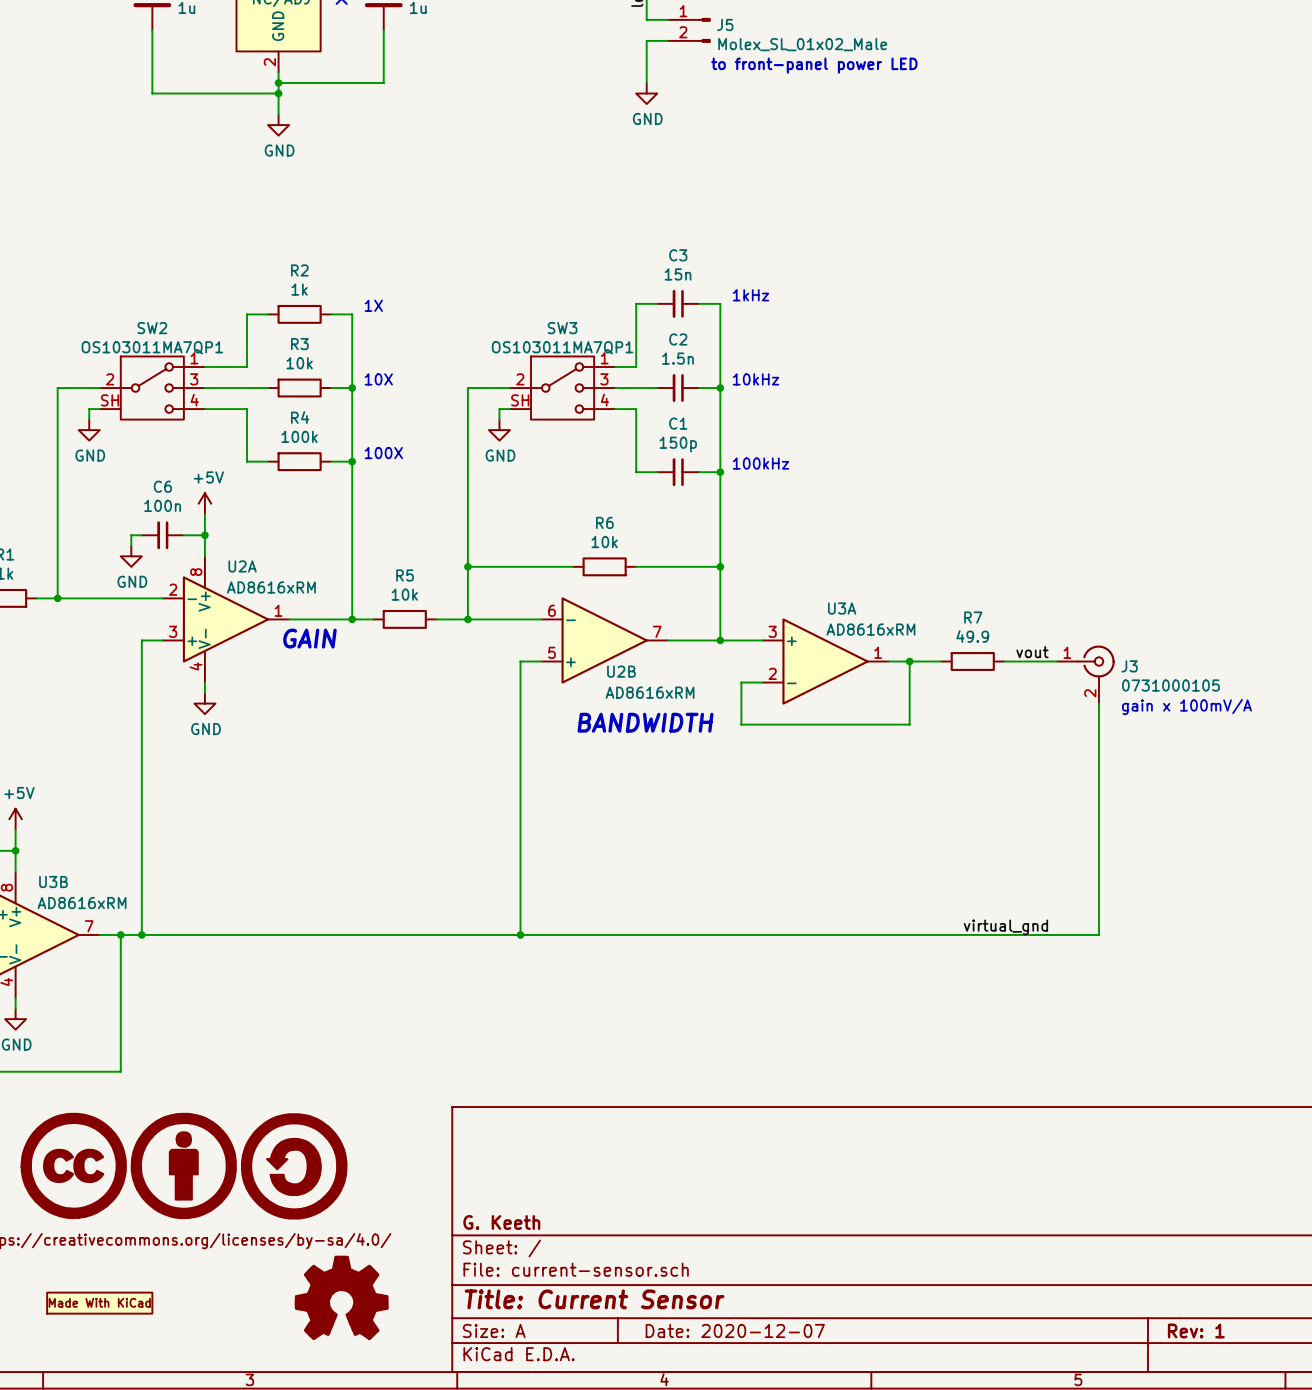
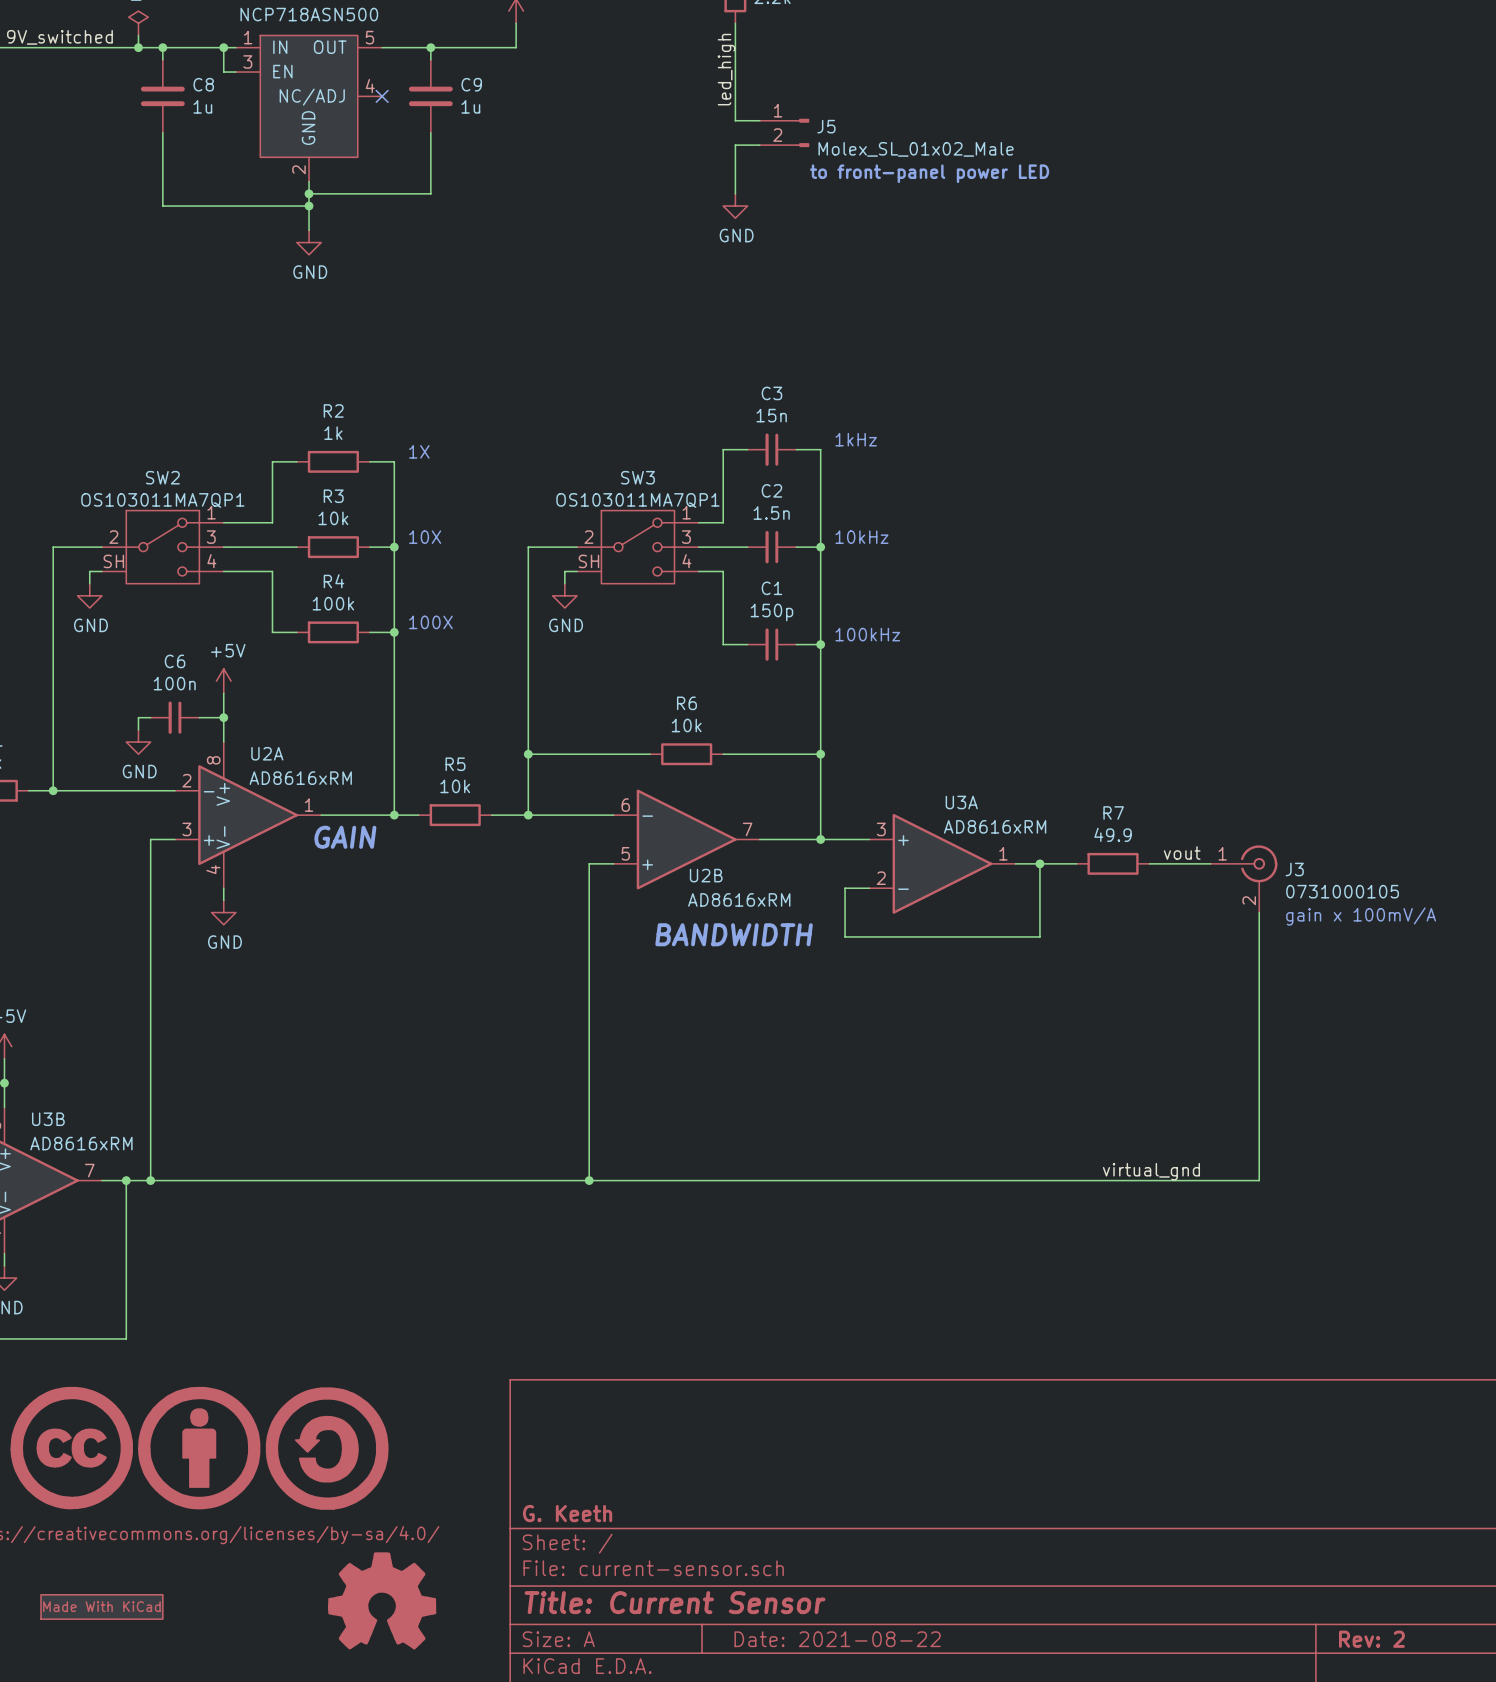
title block: Date: 2020-12-07 (735, 1330) -> Date: 2021-08-22 (837, 1639)
title block: Rev: 1 (1196, 1330) -> Rev: 2 (1371, 1639)

